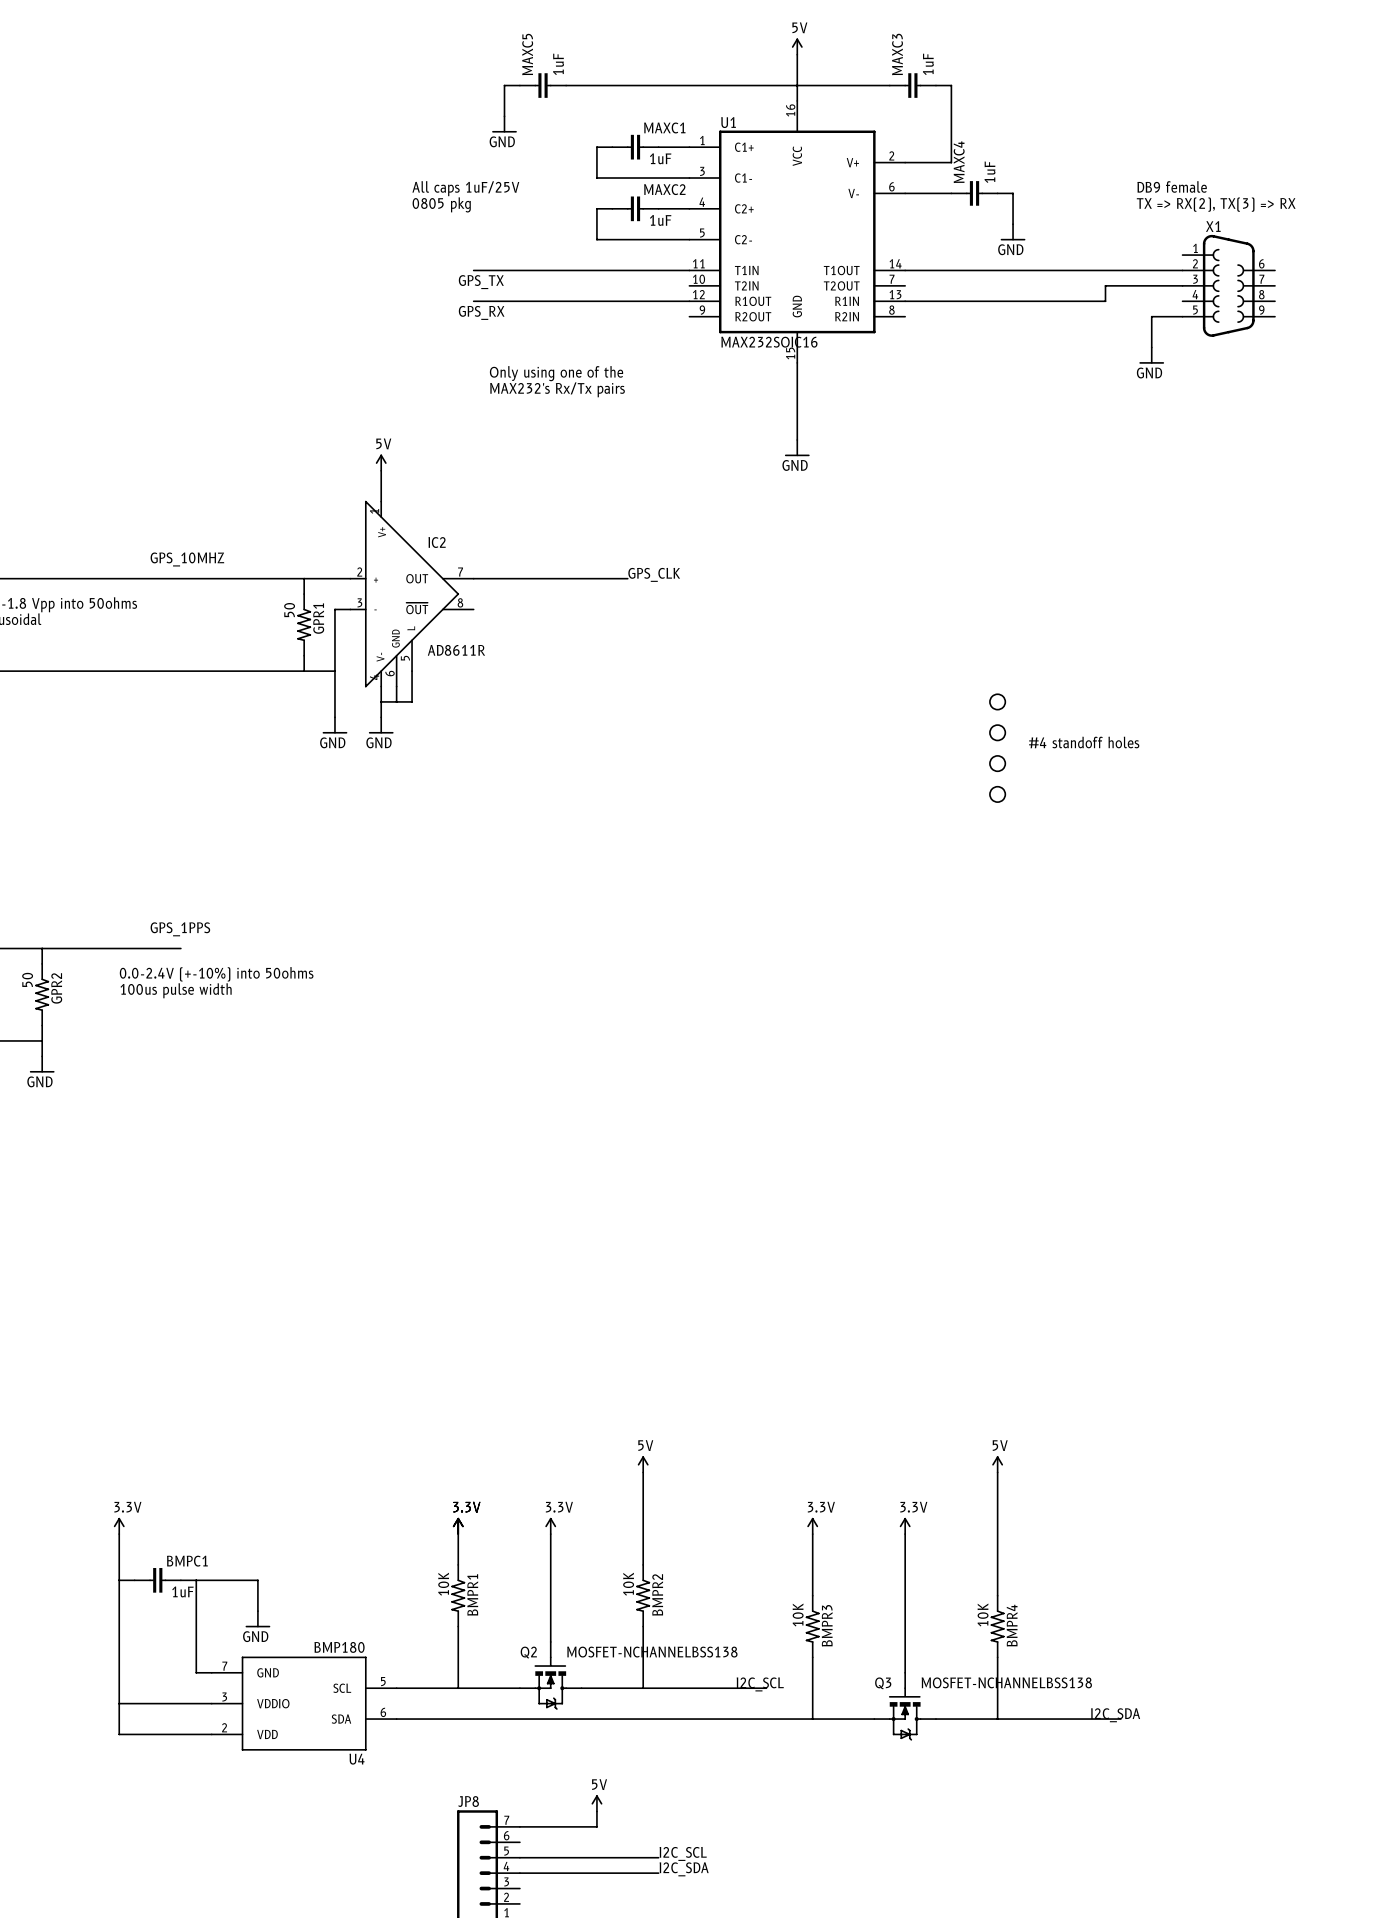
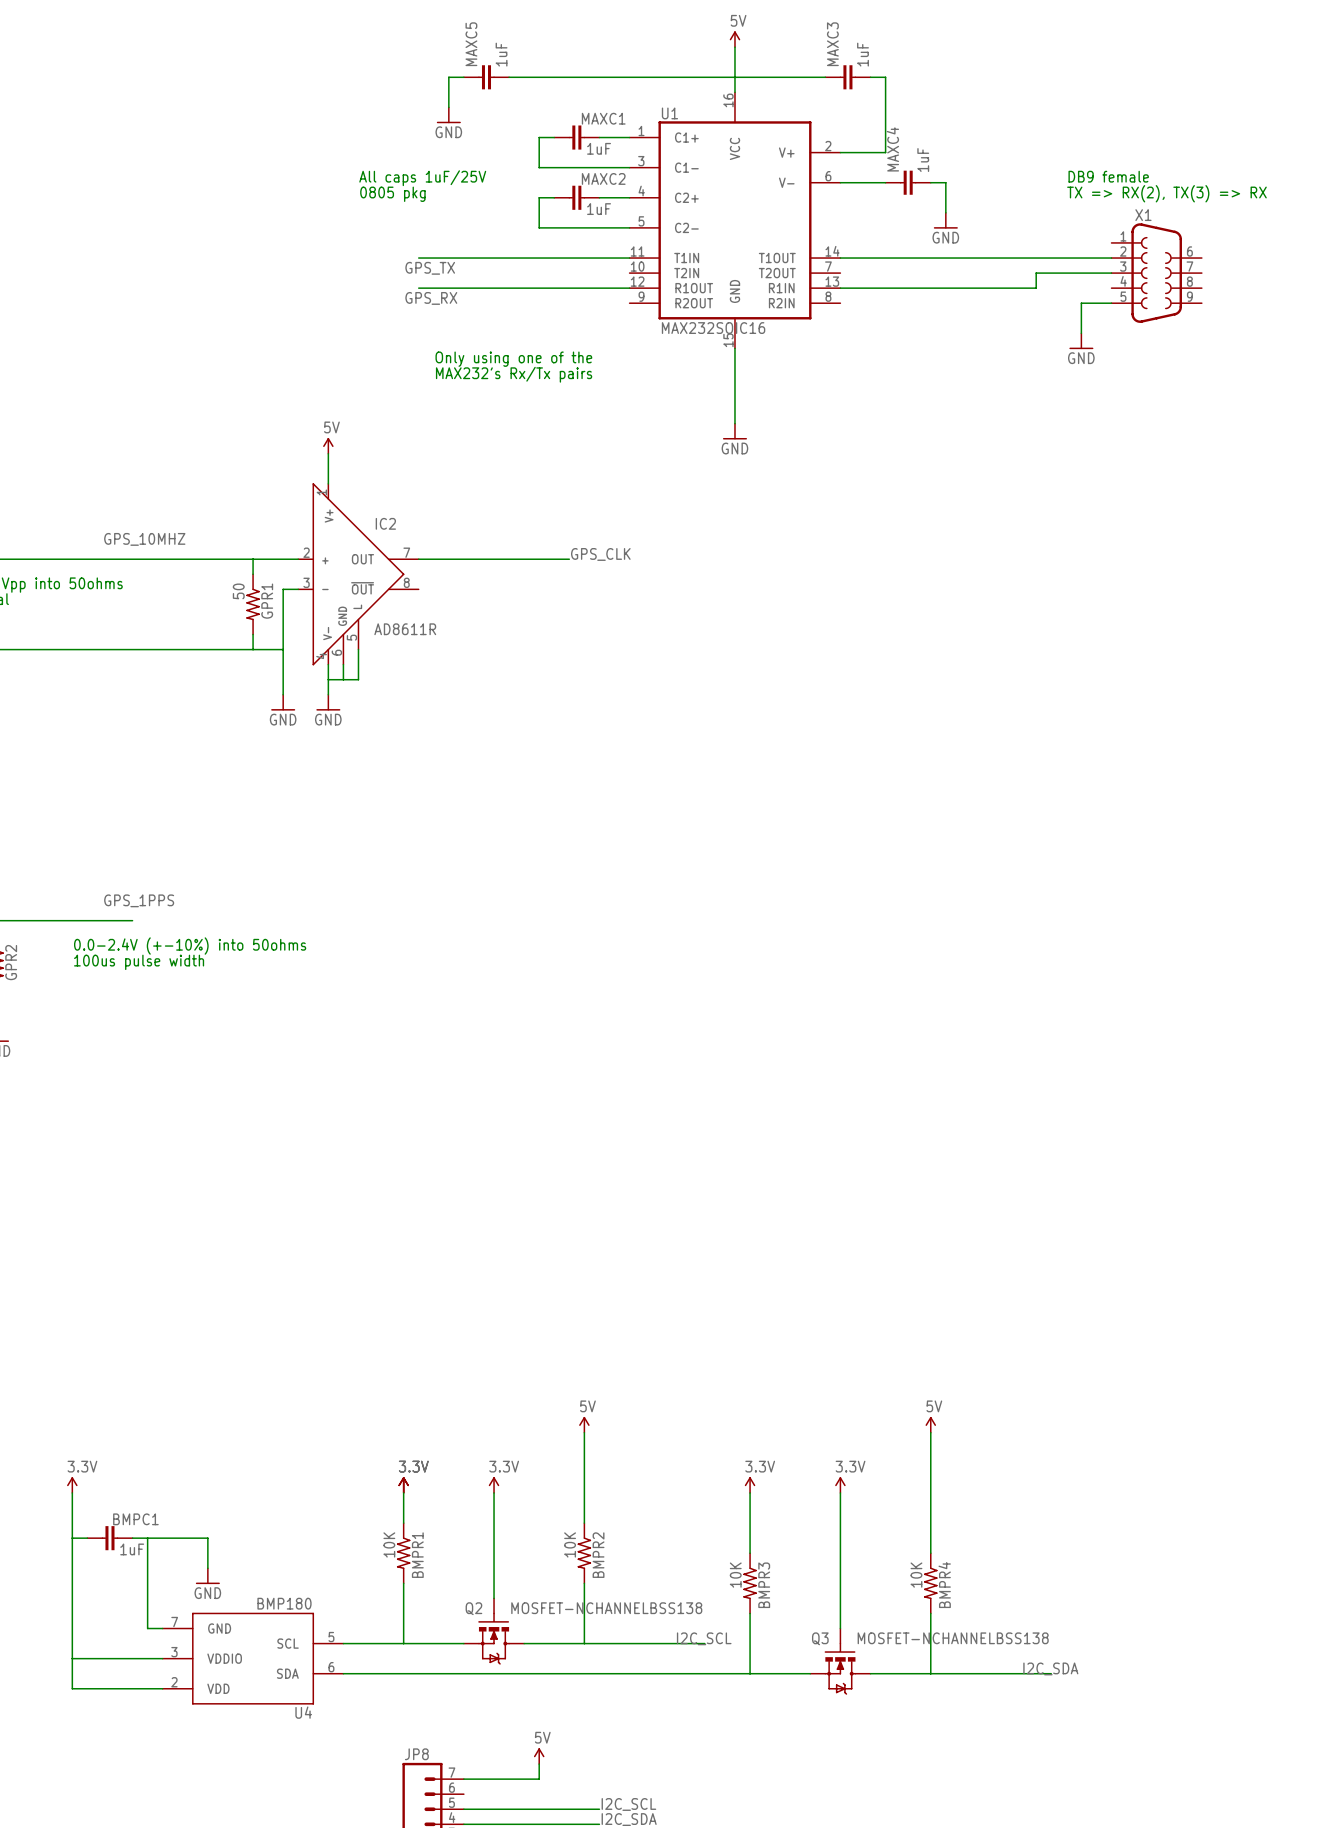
part: (997, 701) -> none
part: (997, 732) -> none
text: #4 standoff holes (1084, 742) -> none
part: (997, 763) -> none
part: (997, 794) -> none

